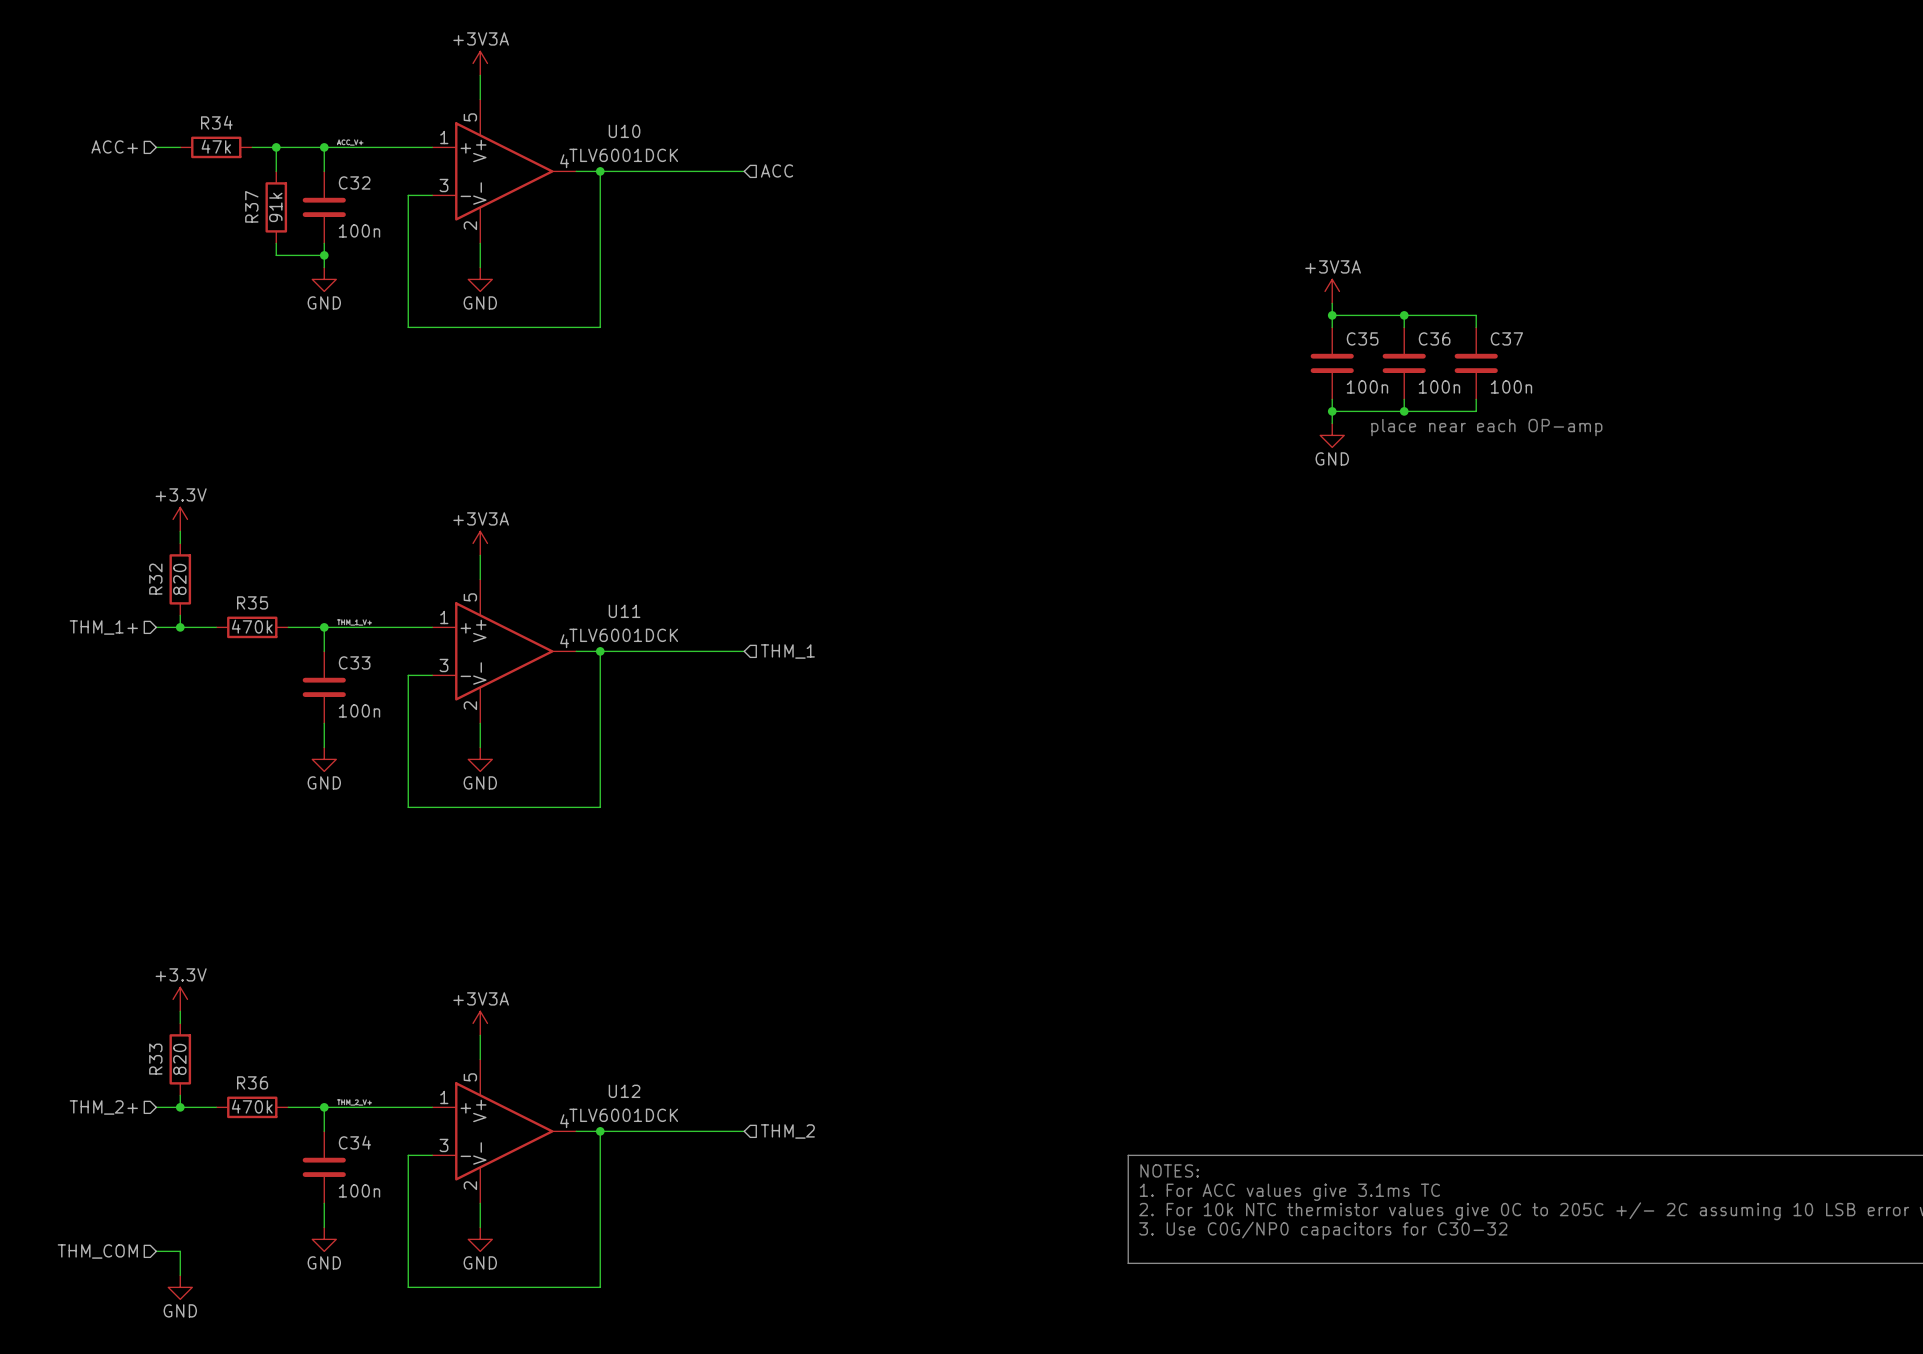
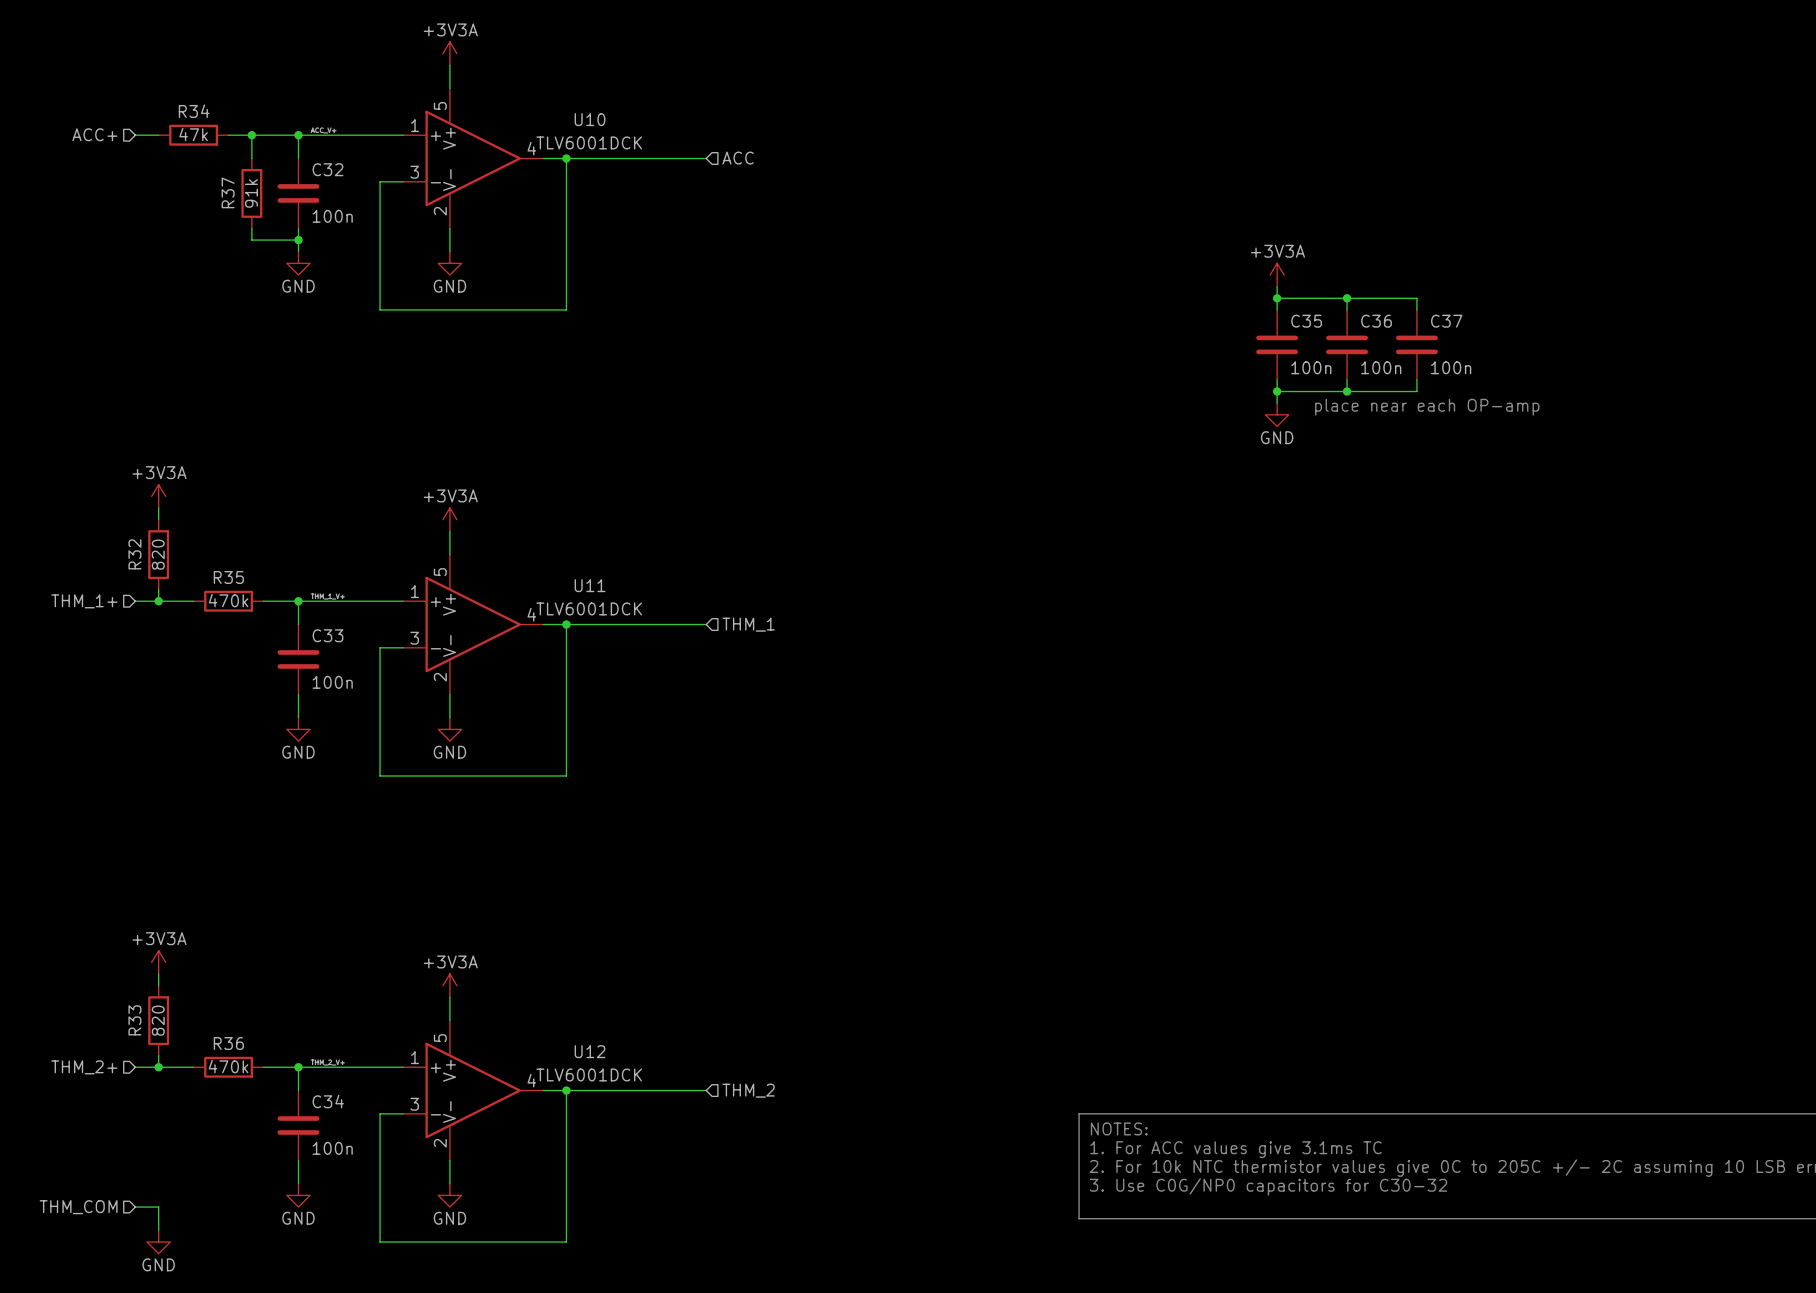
power symbol: +3.3V (180, 519) -> +3V3A (158, 496)
power symbol: +3.3V (180, 999) -> +3V3A (158, 962)

